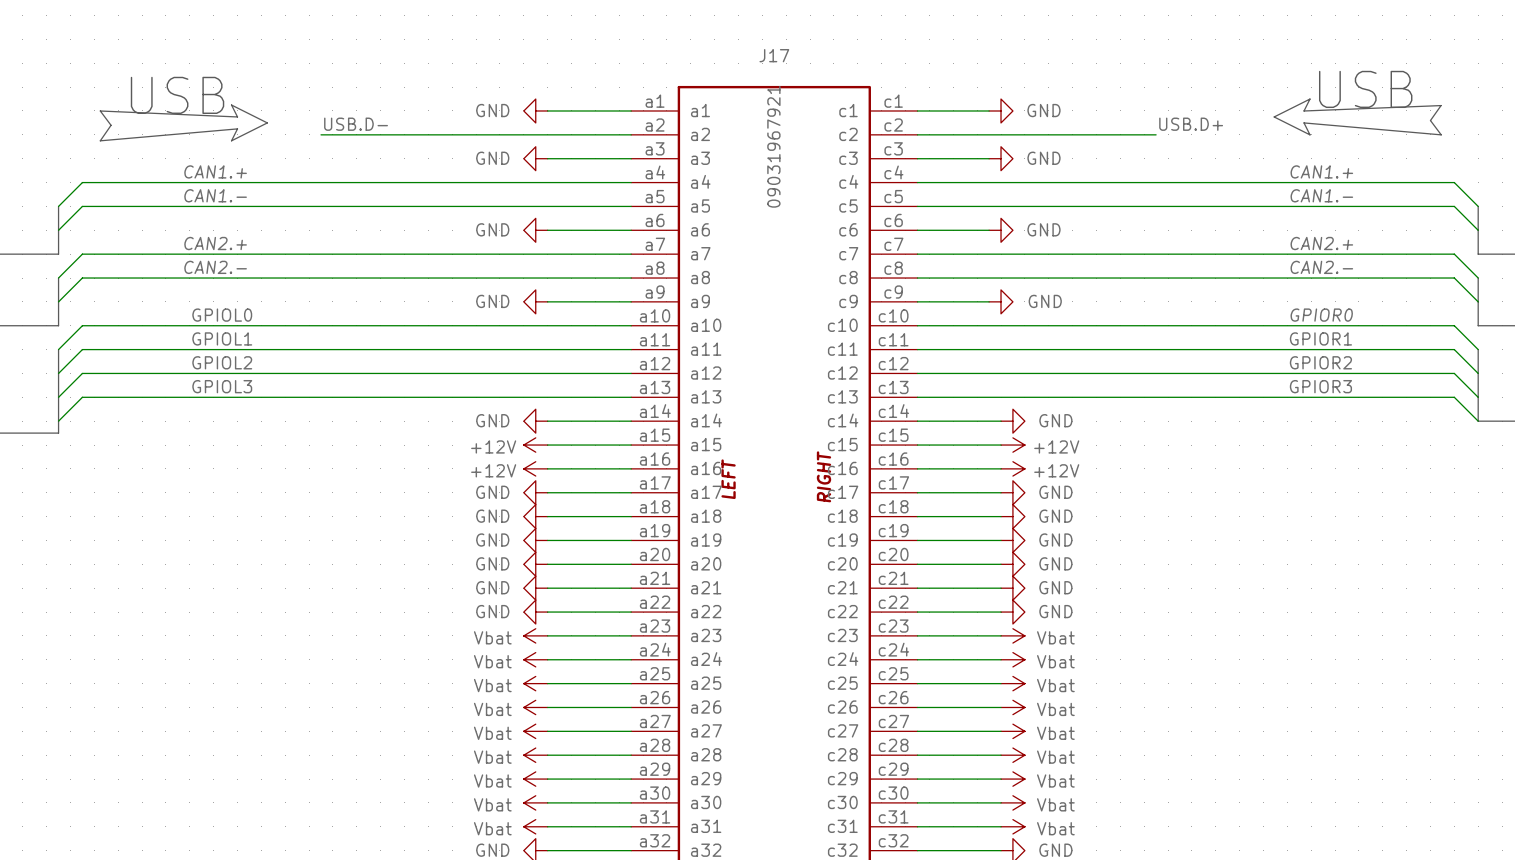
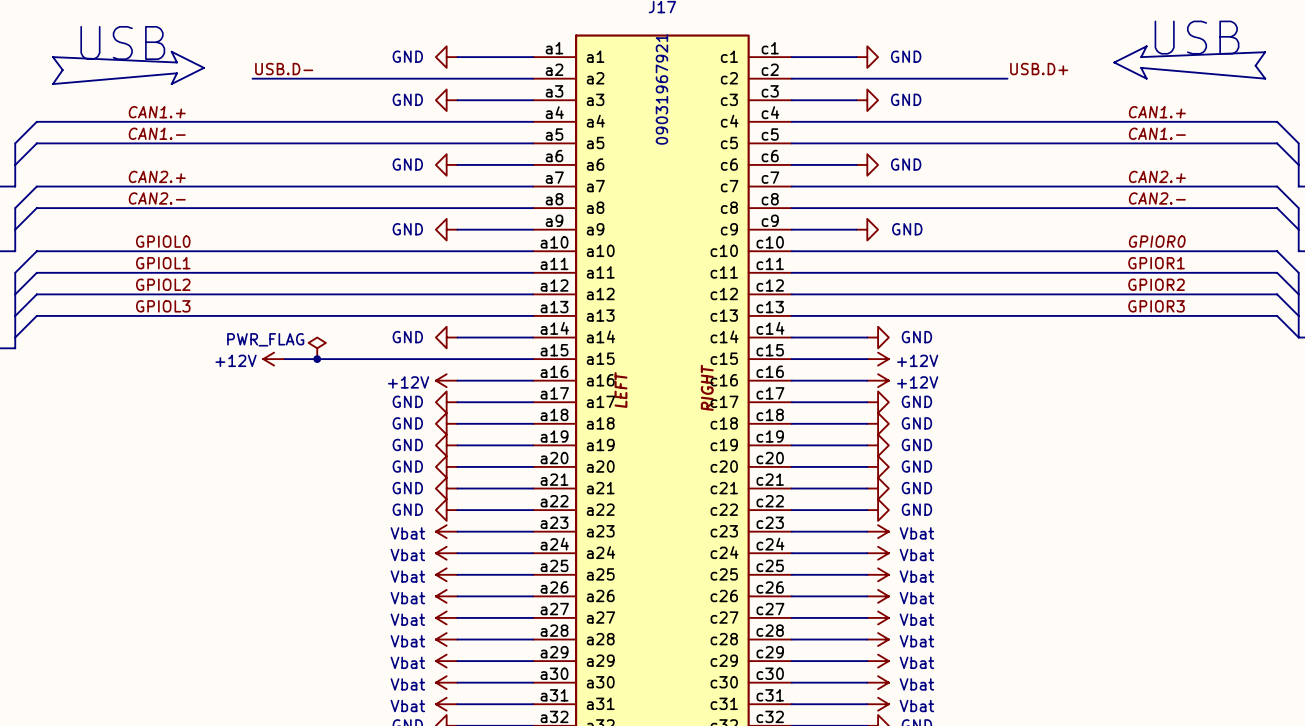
power symbol: none -> PWR_FLAG (317, 348)
wire: none -> (284, 359) (457, 359)
junction: none -> (317, 359)
power symbol position: +12V (535, 445) -> +12V (274, 359)

